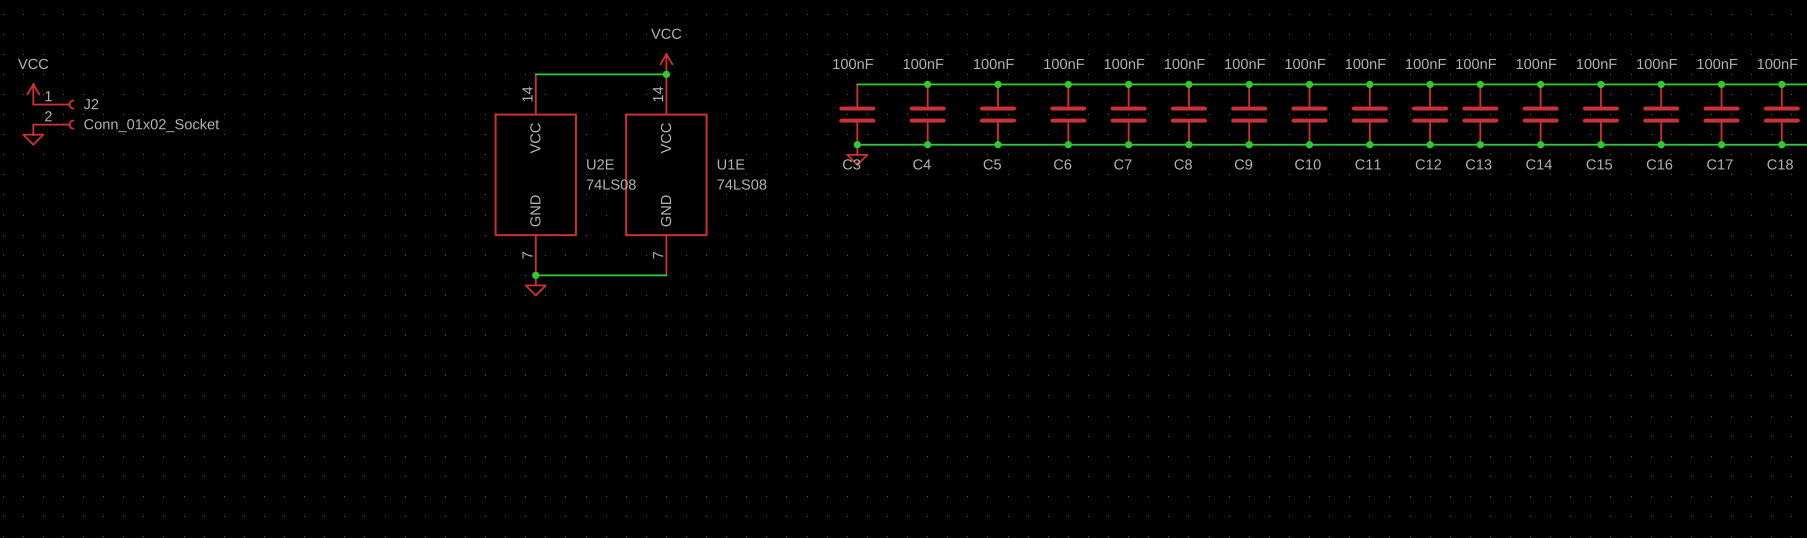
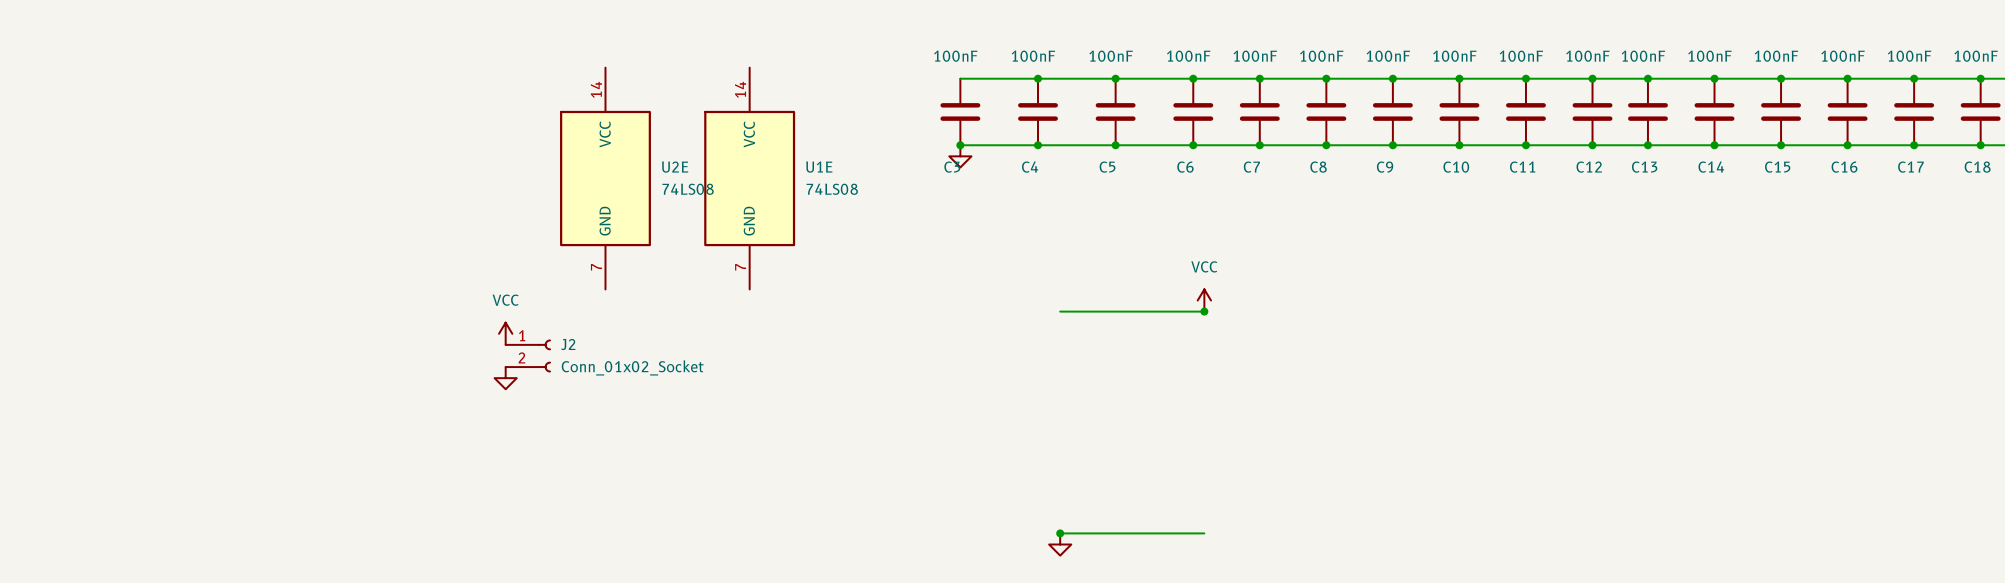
power symbol: VCC (666, 64) -> none
wire: (535, 74) (666, 74) -> none
junction: (666, 74) -> none
power symbol: VCC (33, 94) -> none
J2 position: (53, 114) -> (528, 355)
power symbol: (33, 134) -> none
wire: (535, 275) (666, 275) -> none
junction: (535, 275) -> none
power symbol position: (535, 285) -> (505, 378)
power symbol: none -> VCC (1204, 300)
wire: none -> (1060, 311) (1204, 311)
junction: none -> (1204, 311)
power symbol: none -> VCC (505, 333)
wire: none -> (1060, 533) (1204, 533)
junction: none -> (1060, 533)
power symbol: none -> (1060, 544)

